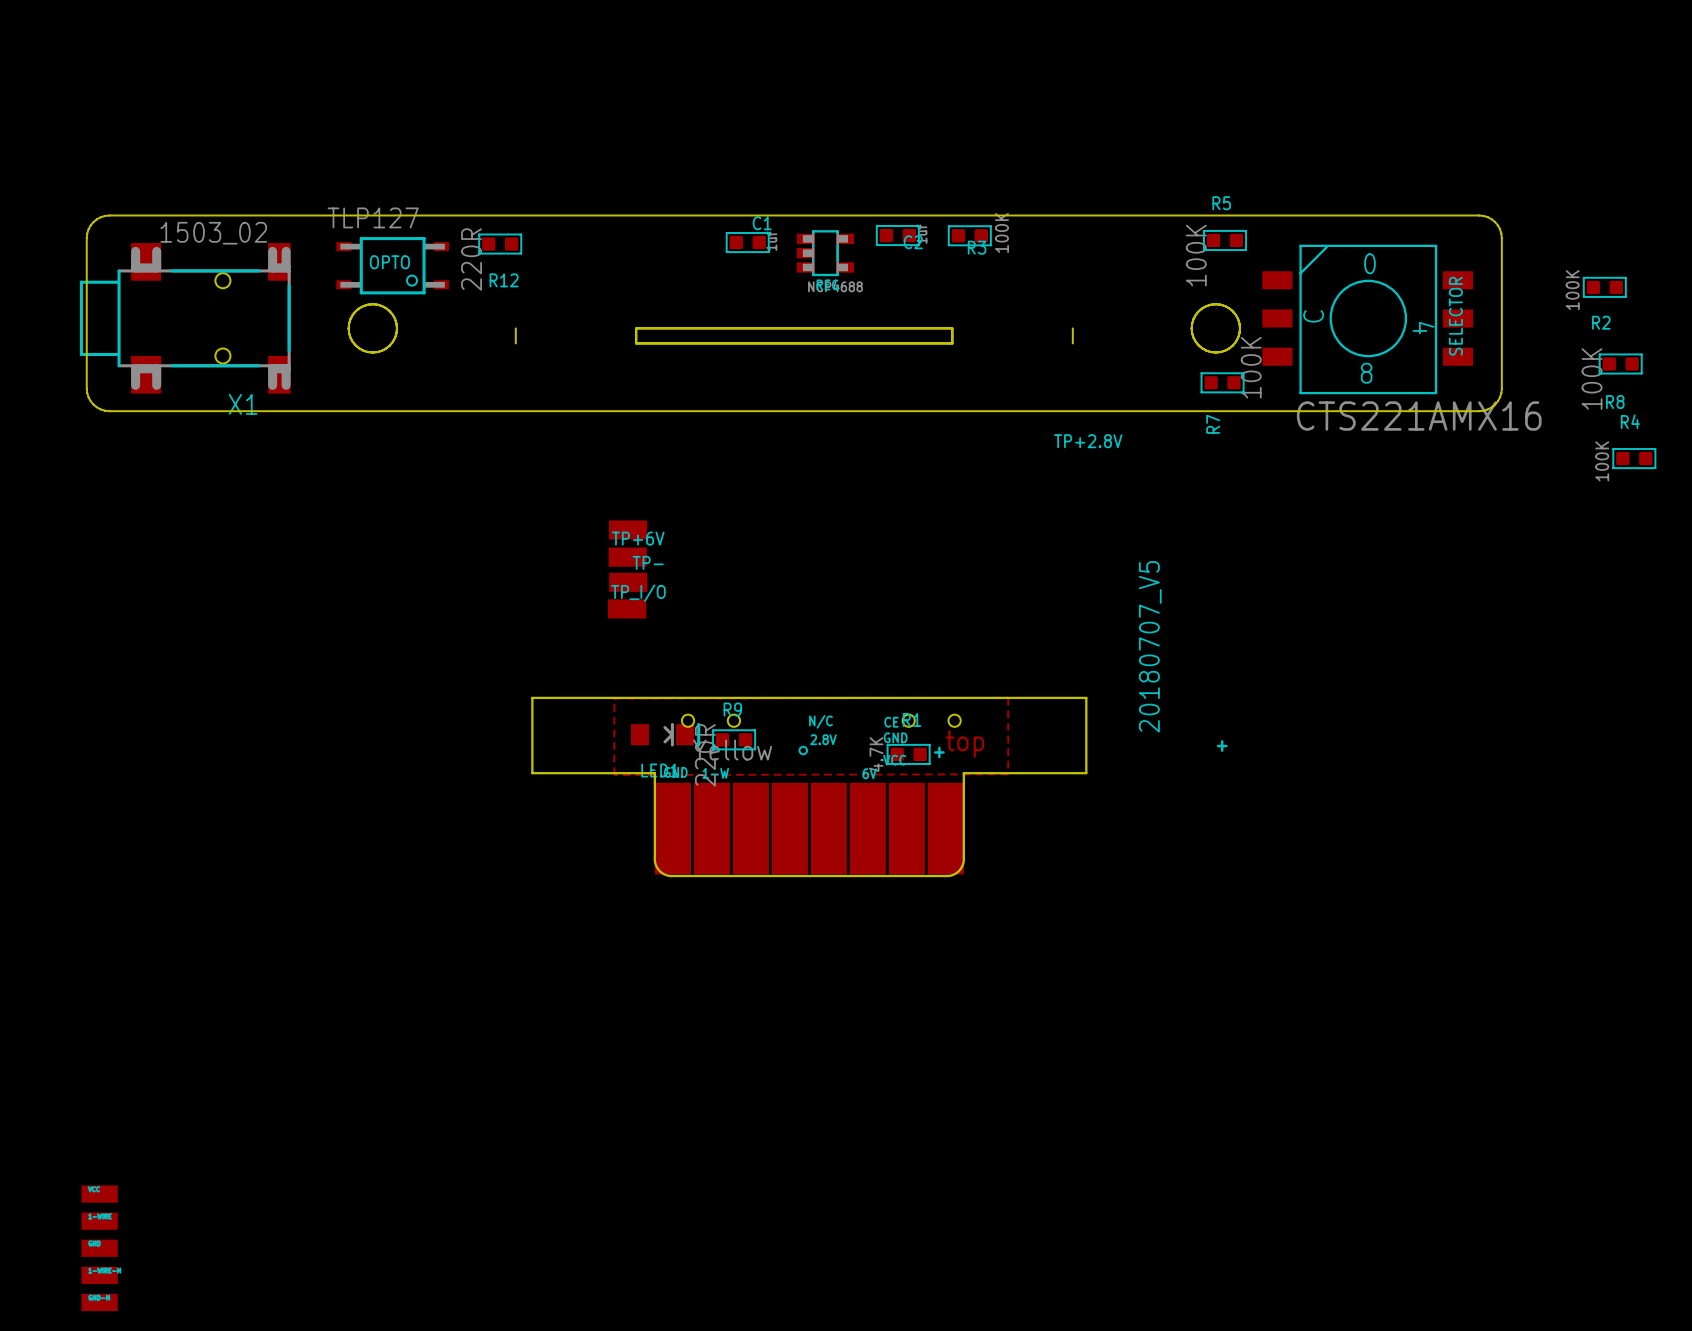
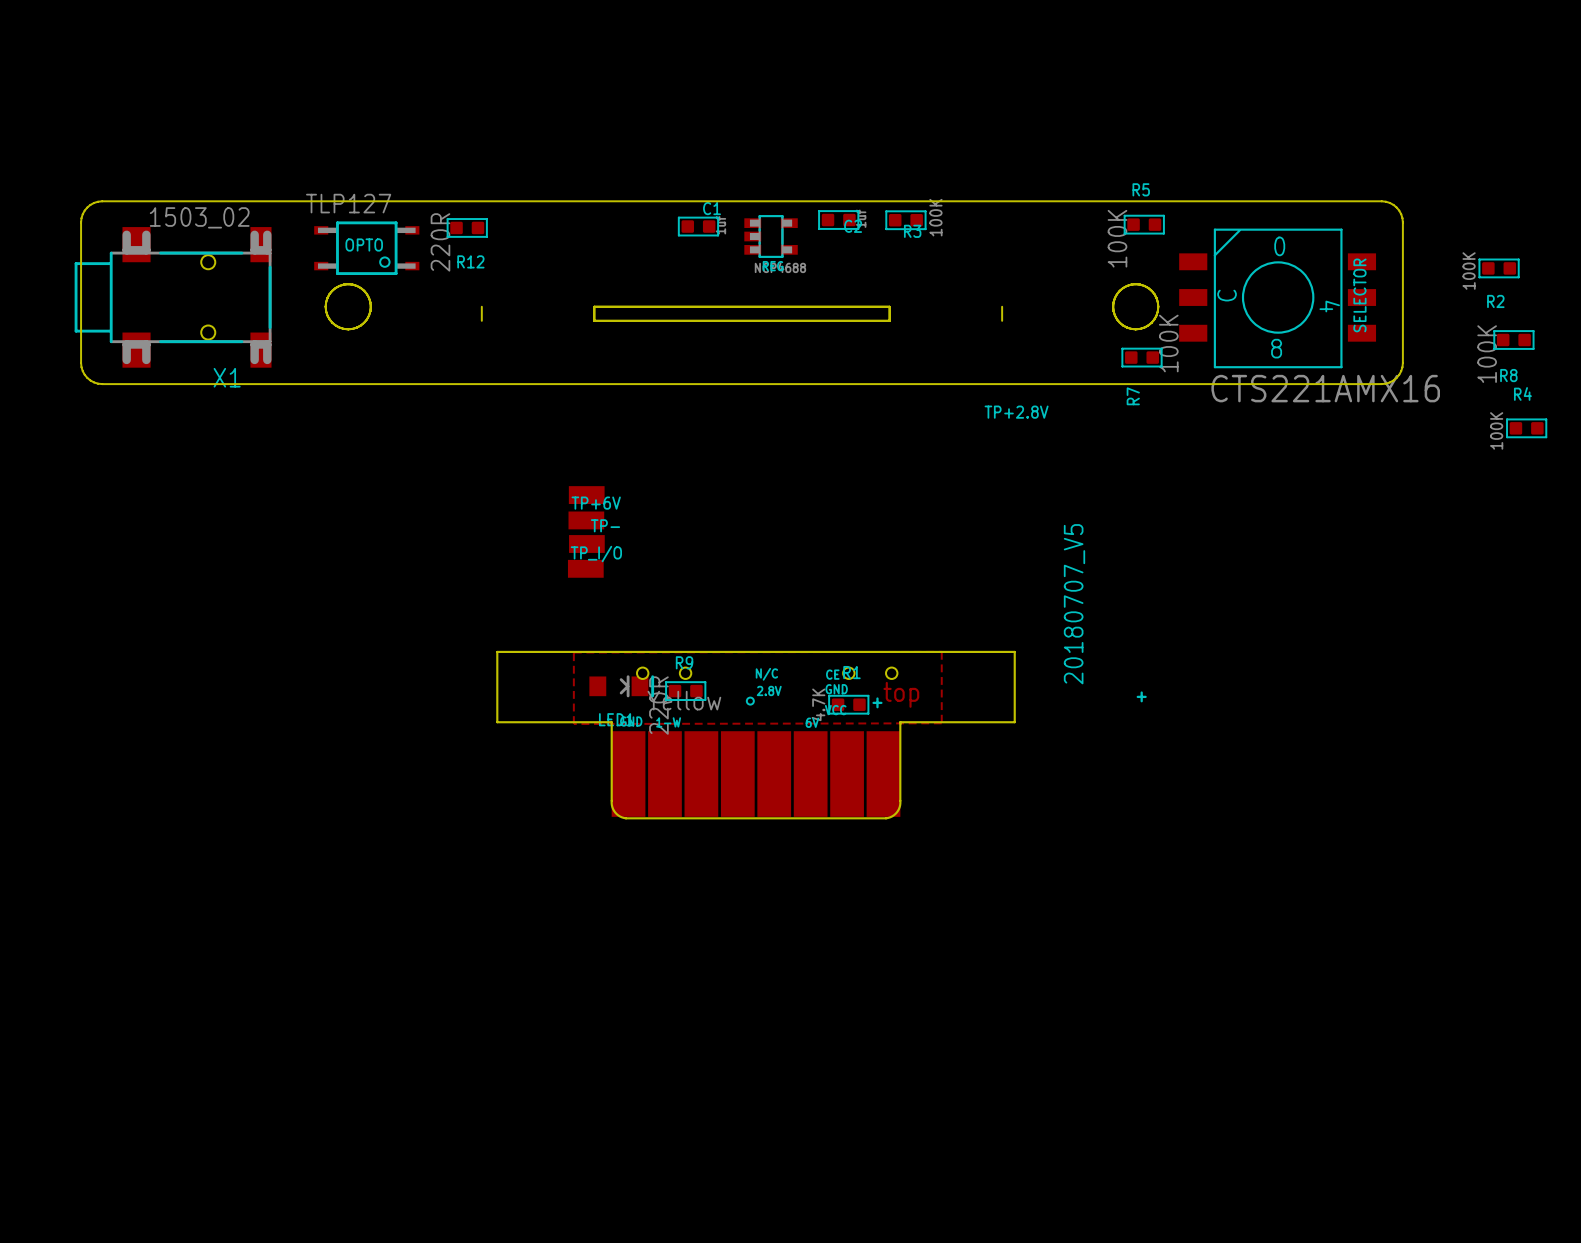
part: (99, 1194) -> none
part: (99, 1221) -> none
part: (99, 1248) -> none
part: (99, 1275) -> none
part: (99, 1302) -> none

